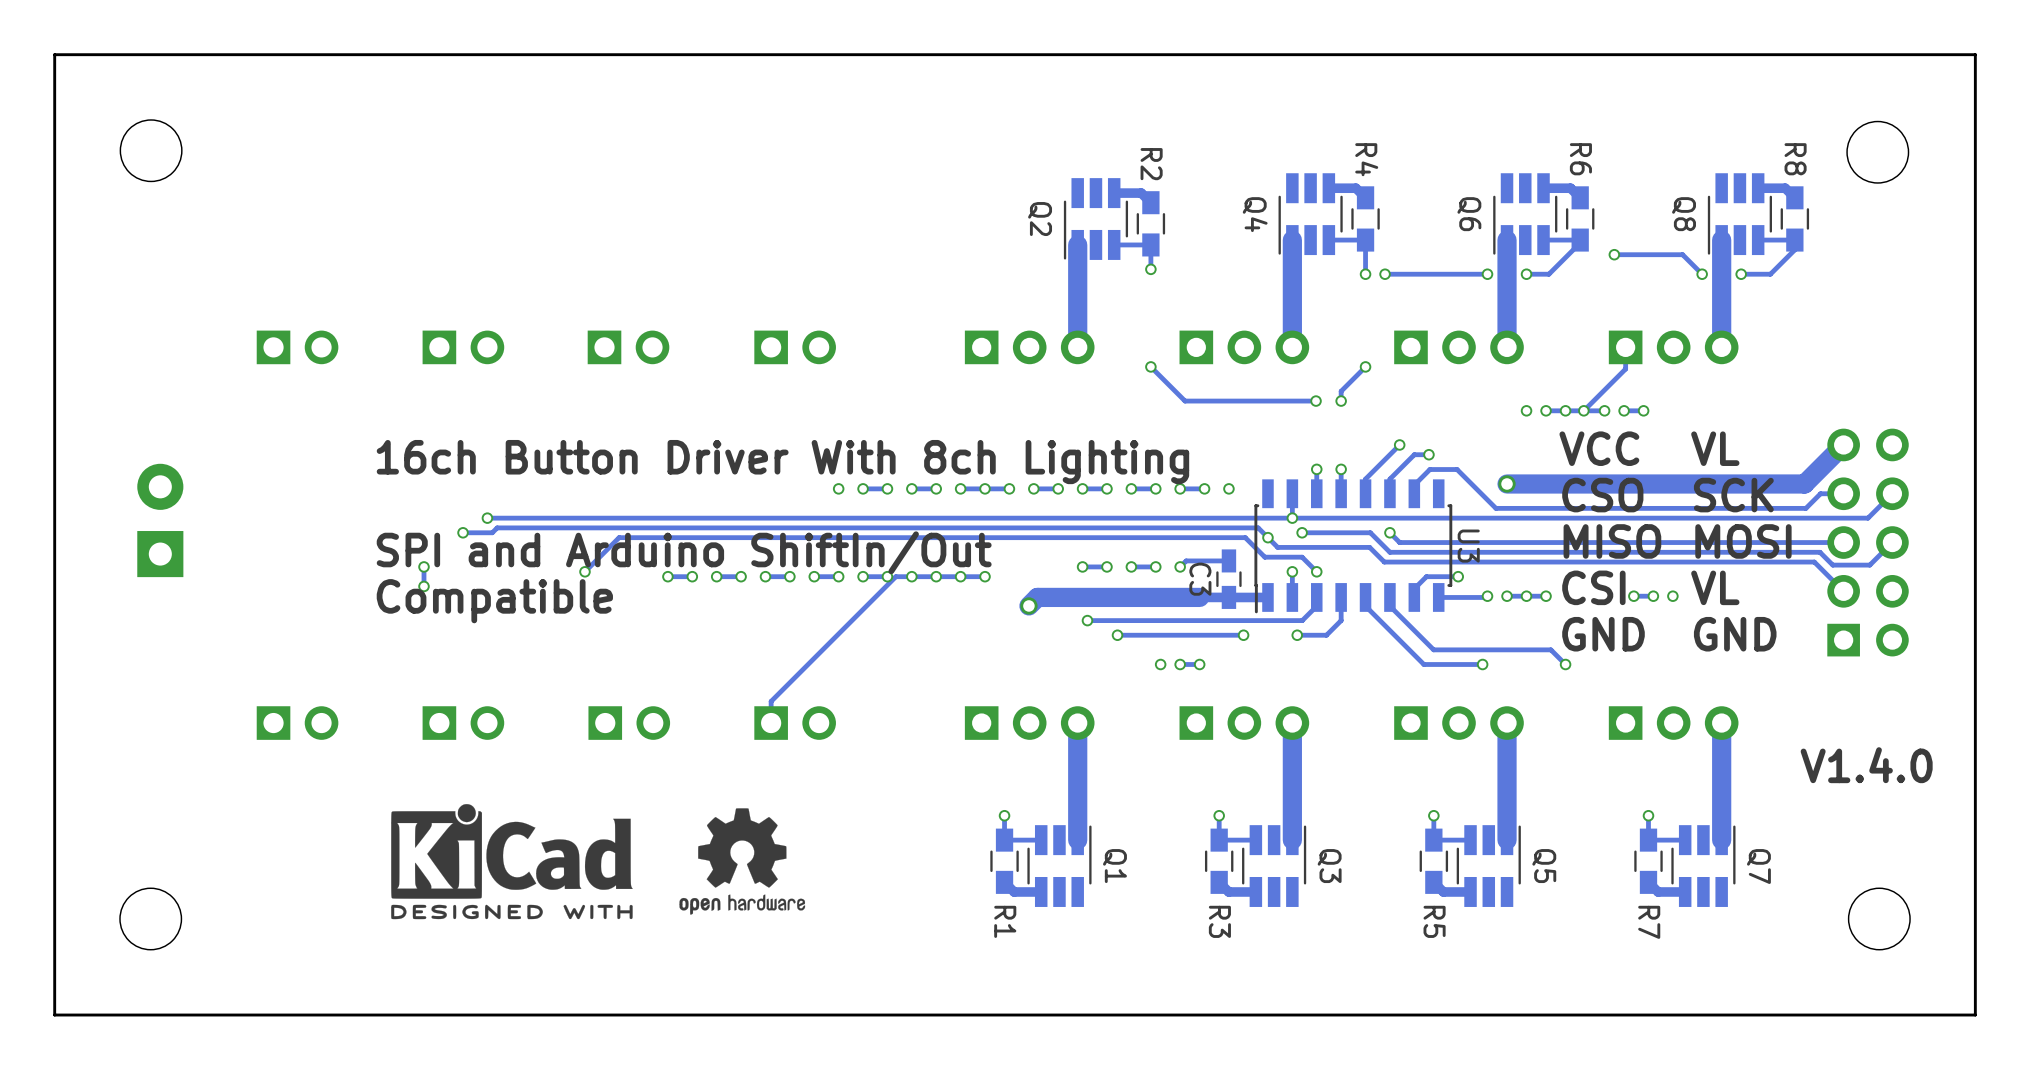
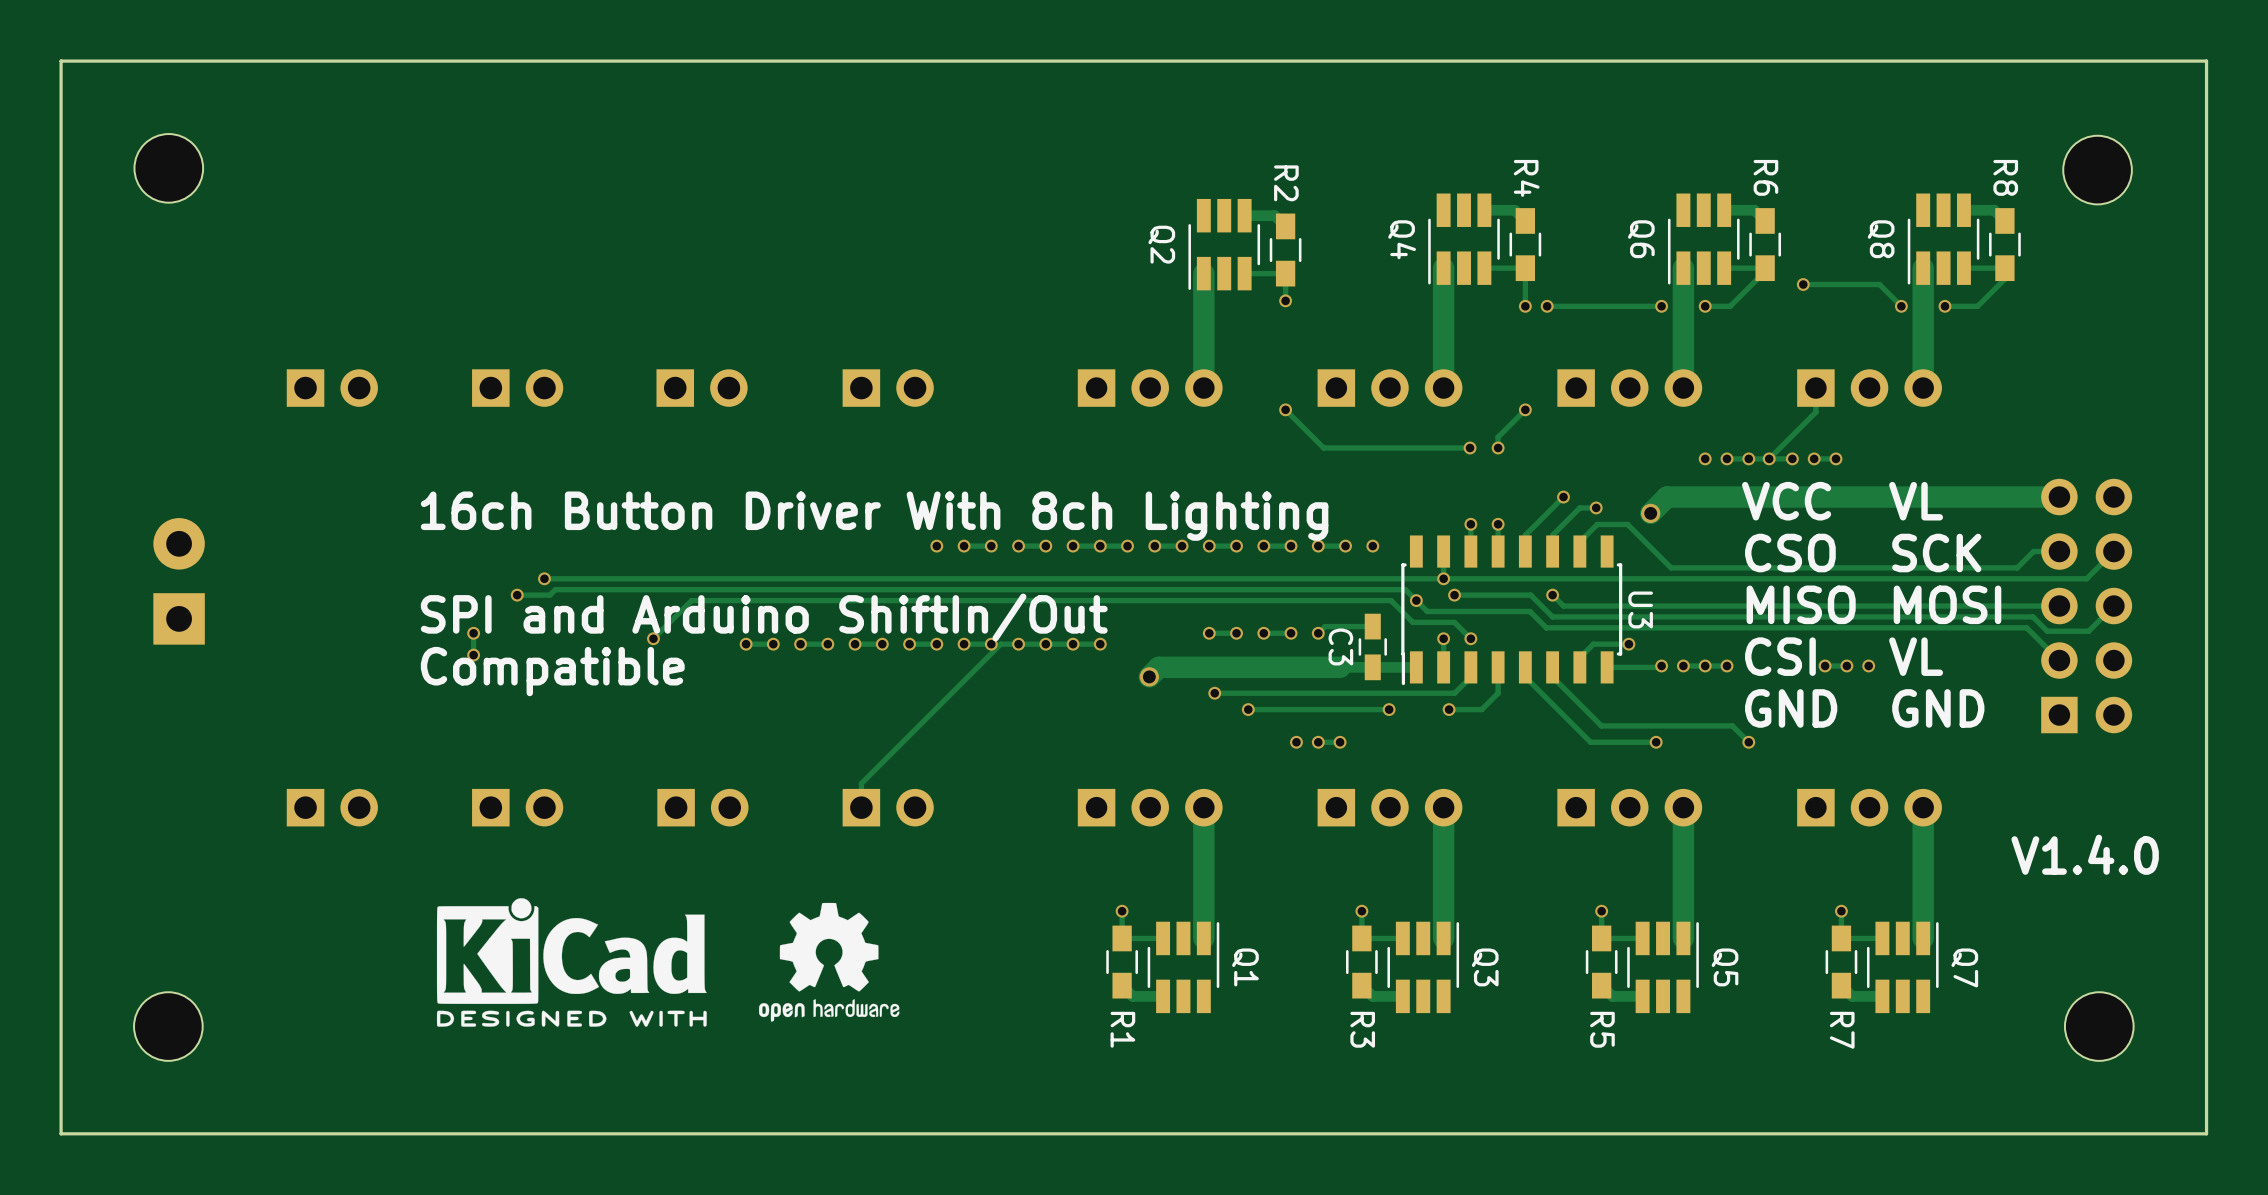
track: (1843, 444) (1804, 483) (1507, 483) -> (2059, 497) (1667, 497) (1650, 513)
via position: (1507, 483) -> (1650, 513)

